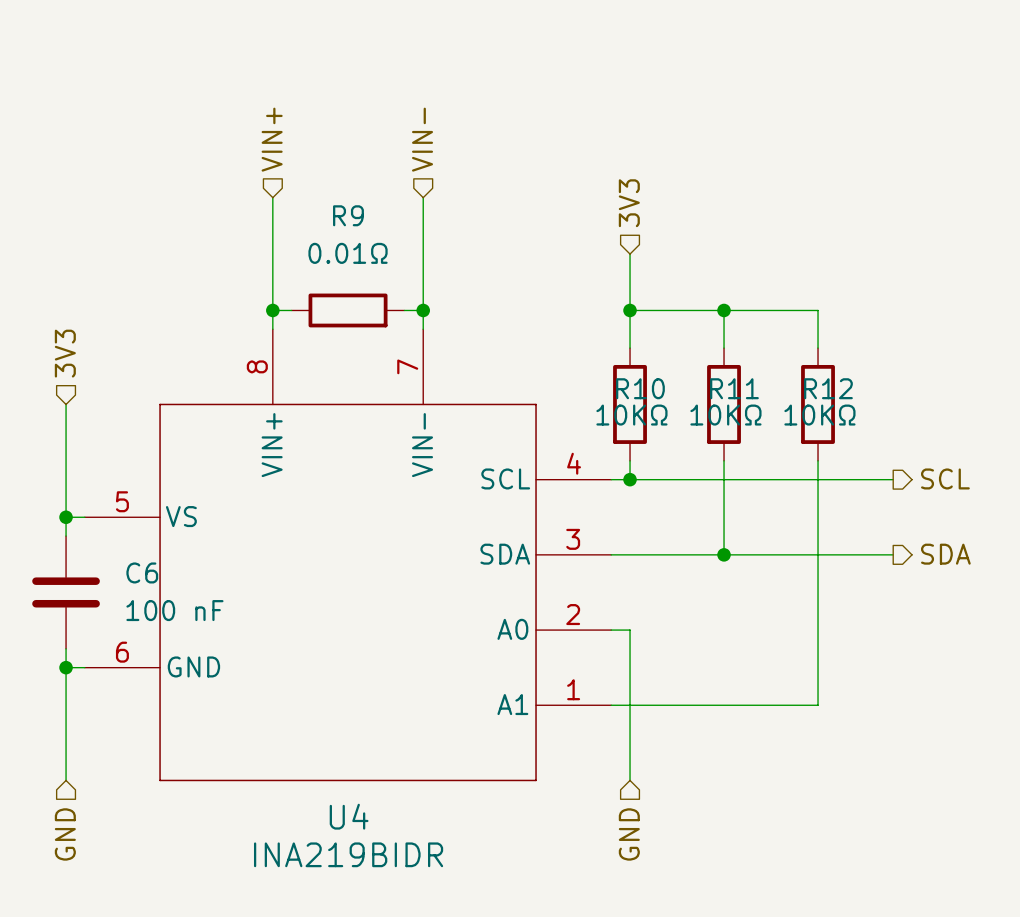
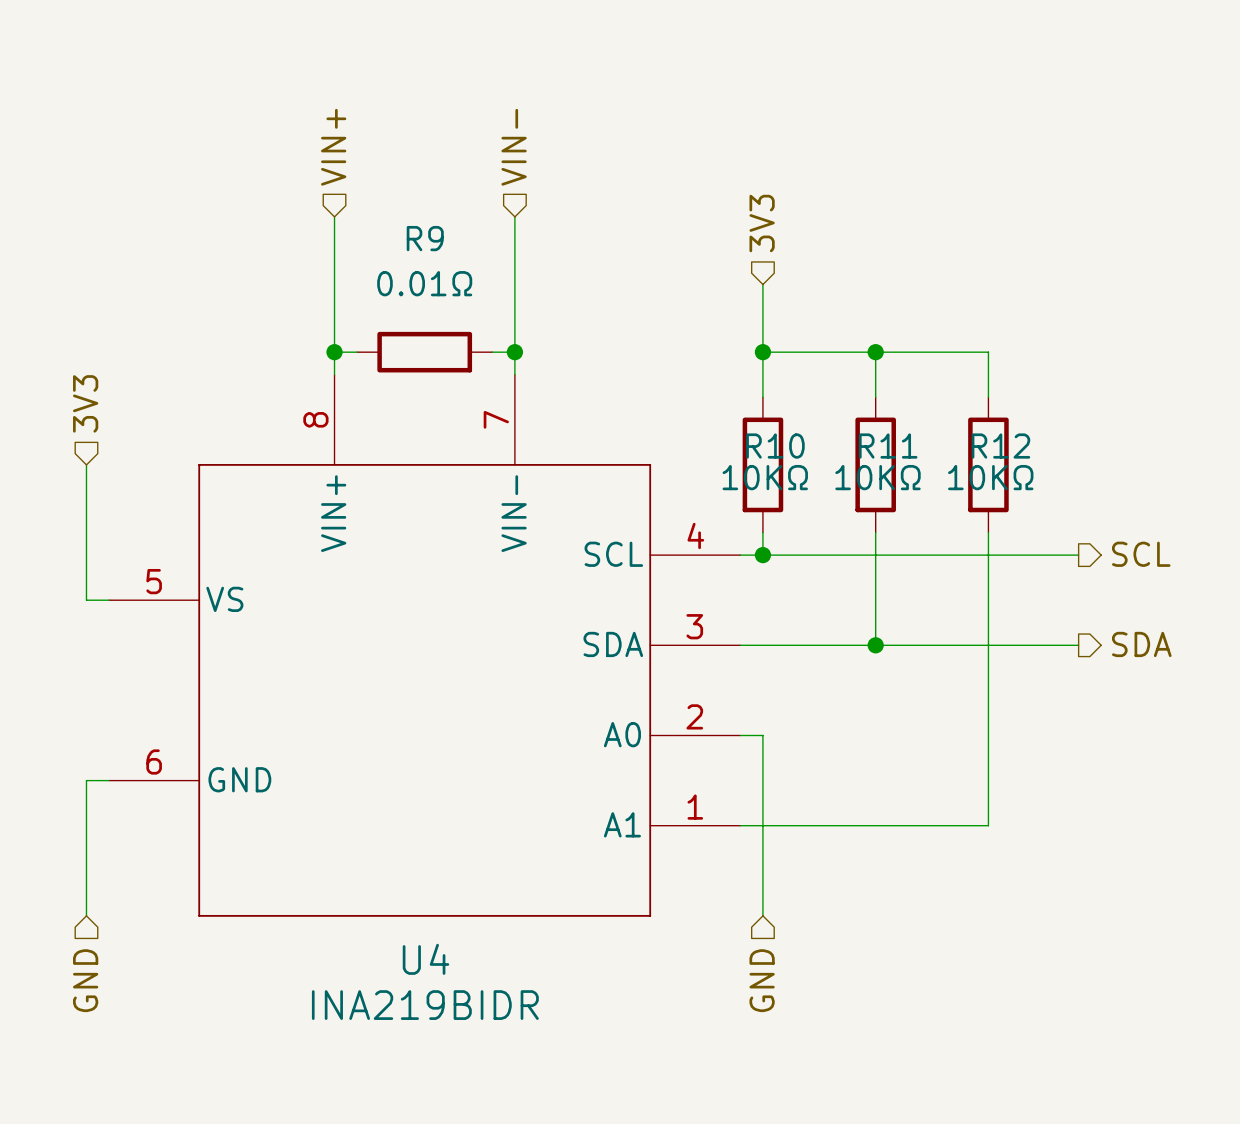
wire: (66, 517) (66, 536) -> none
junction: (66, 517) -> none
C6: 100 nF (66, 592) -> none
wire: (66, 648) (66, 667) -> none
junction: (66, 667) -> none

